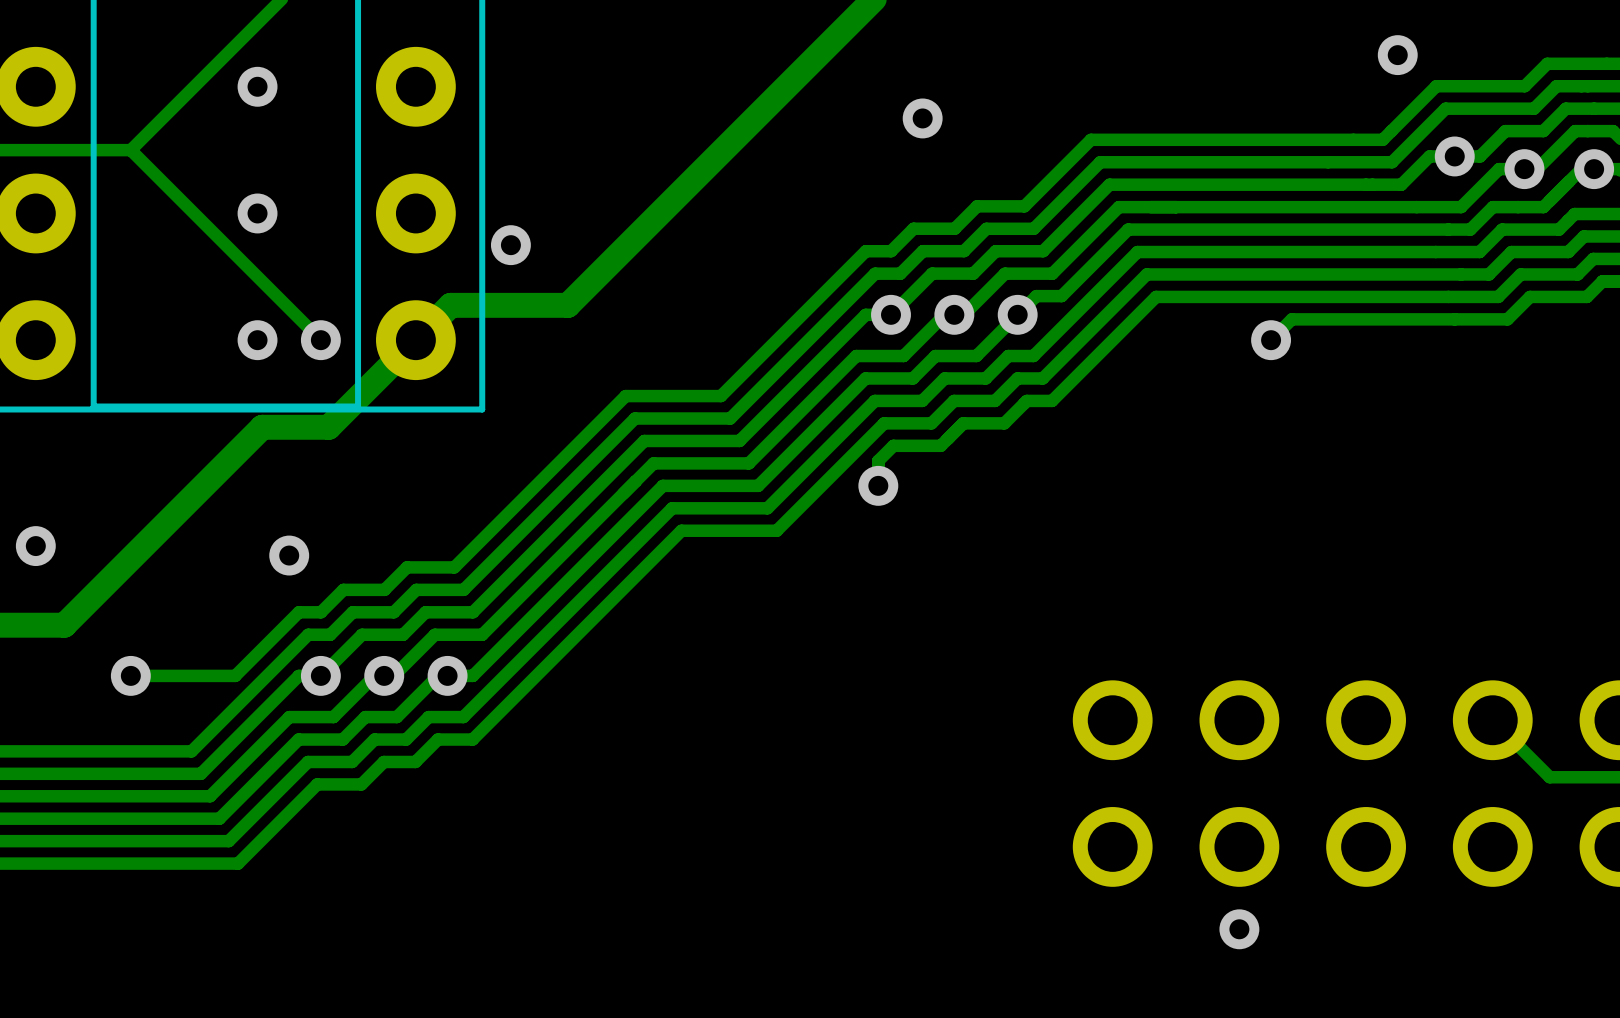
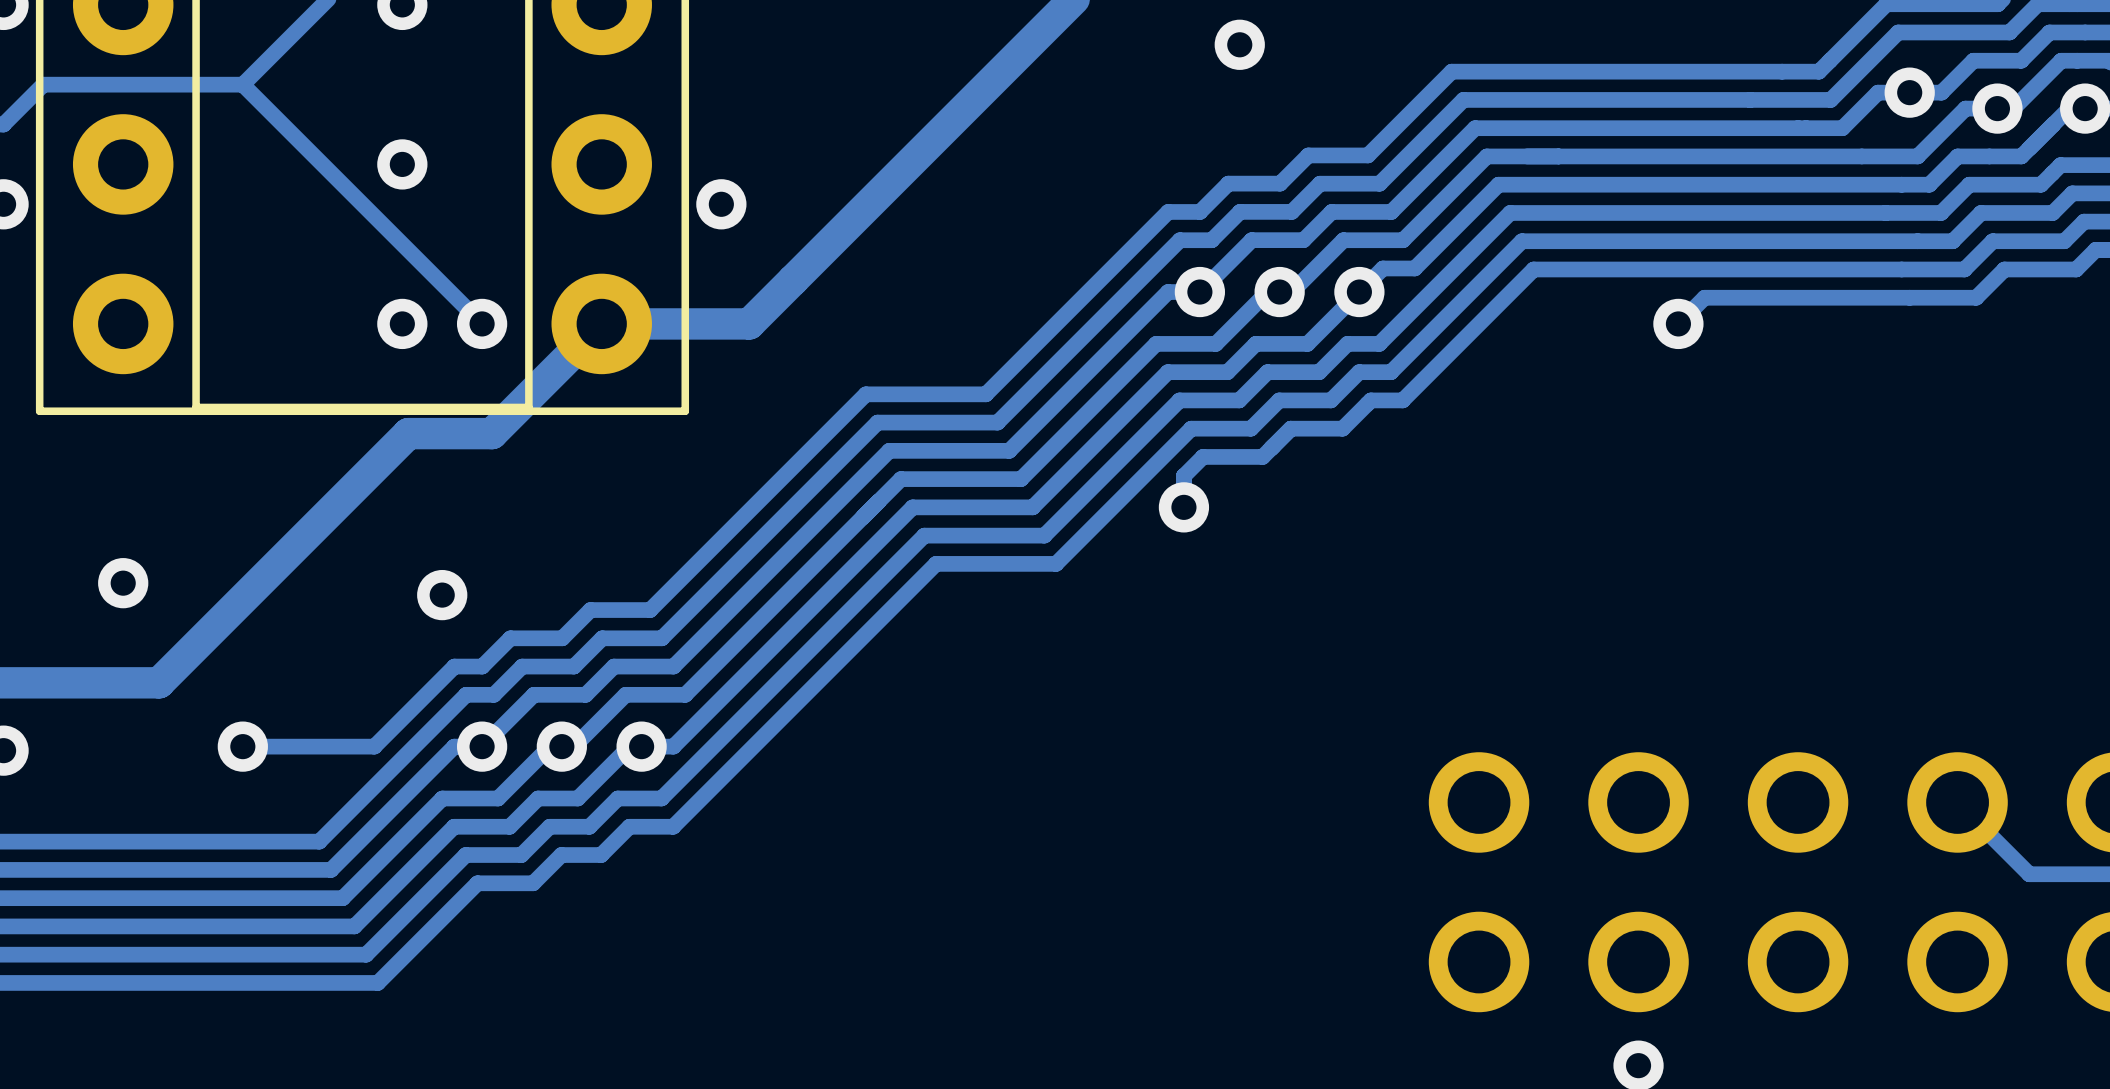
track: (567, 305) (450, 305) (415, 340) -> (793, 280) (749, 323) (601, 323)

